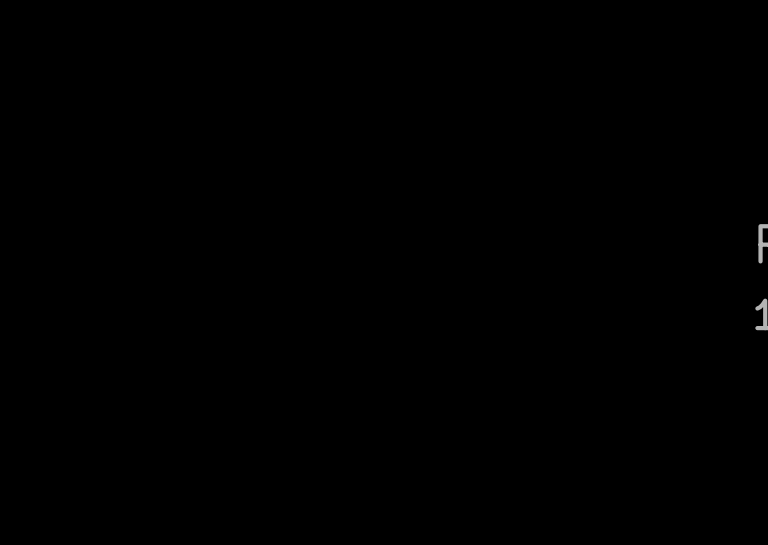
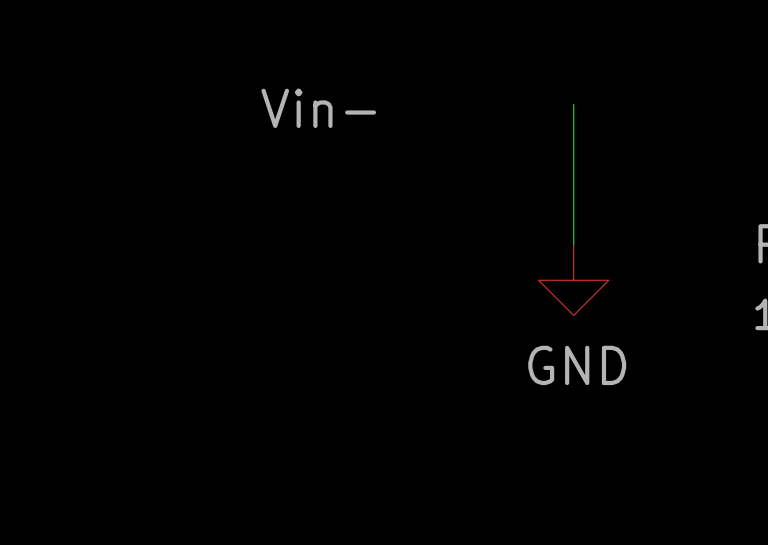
wire: none -> (573, 104) (573, 245)
label: none -> Vin- (318, 108)
power symbol: none -> GND (573, 280)

